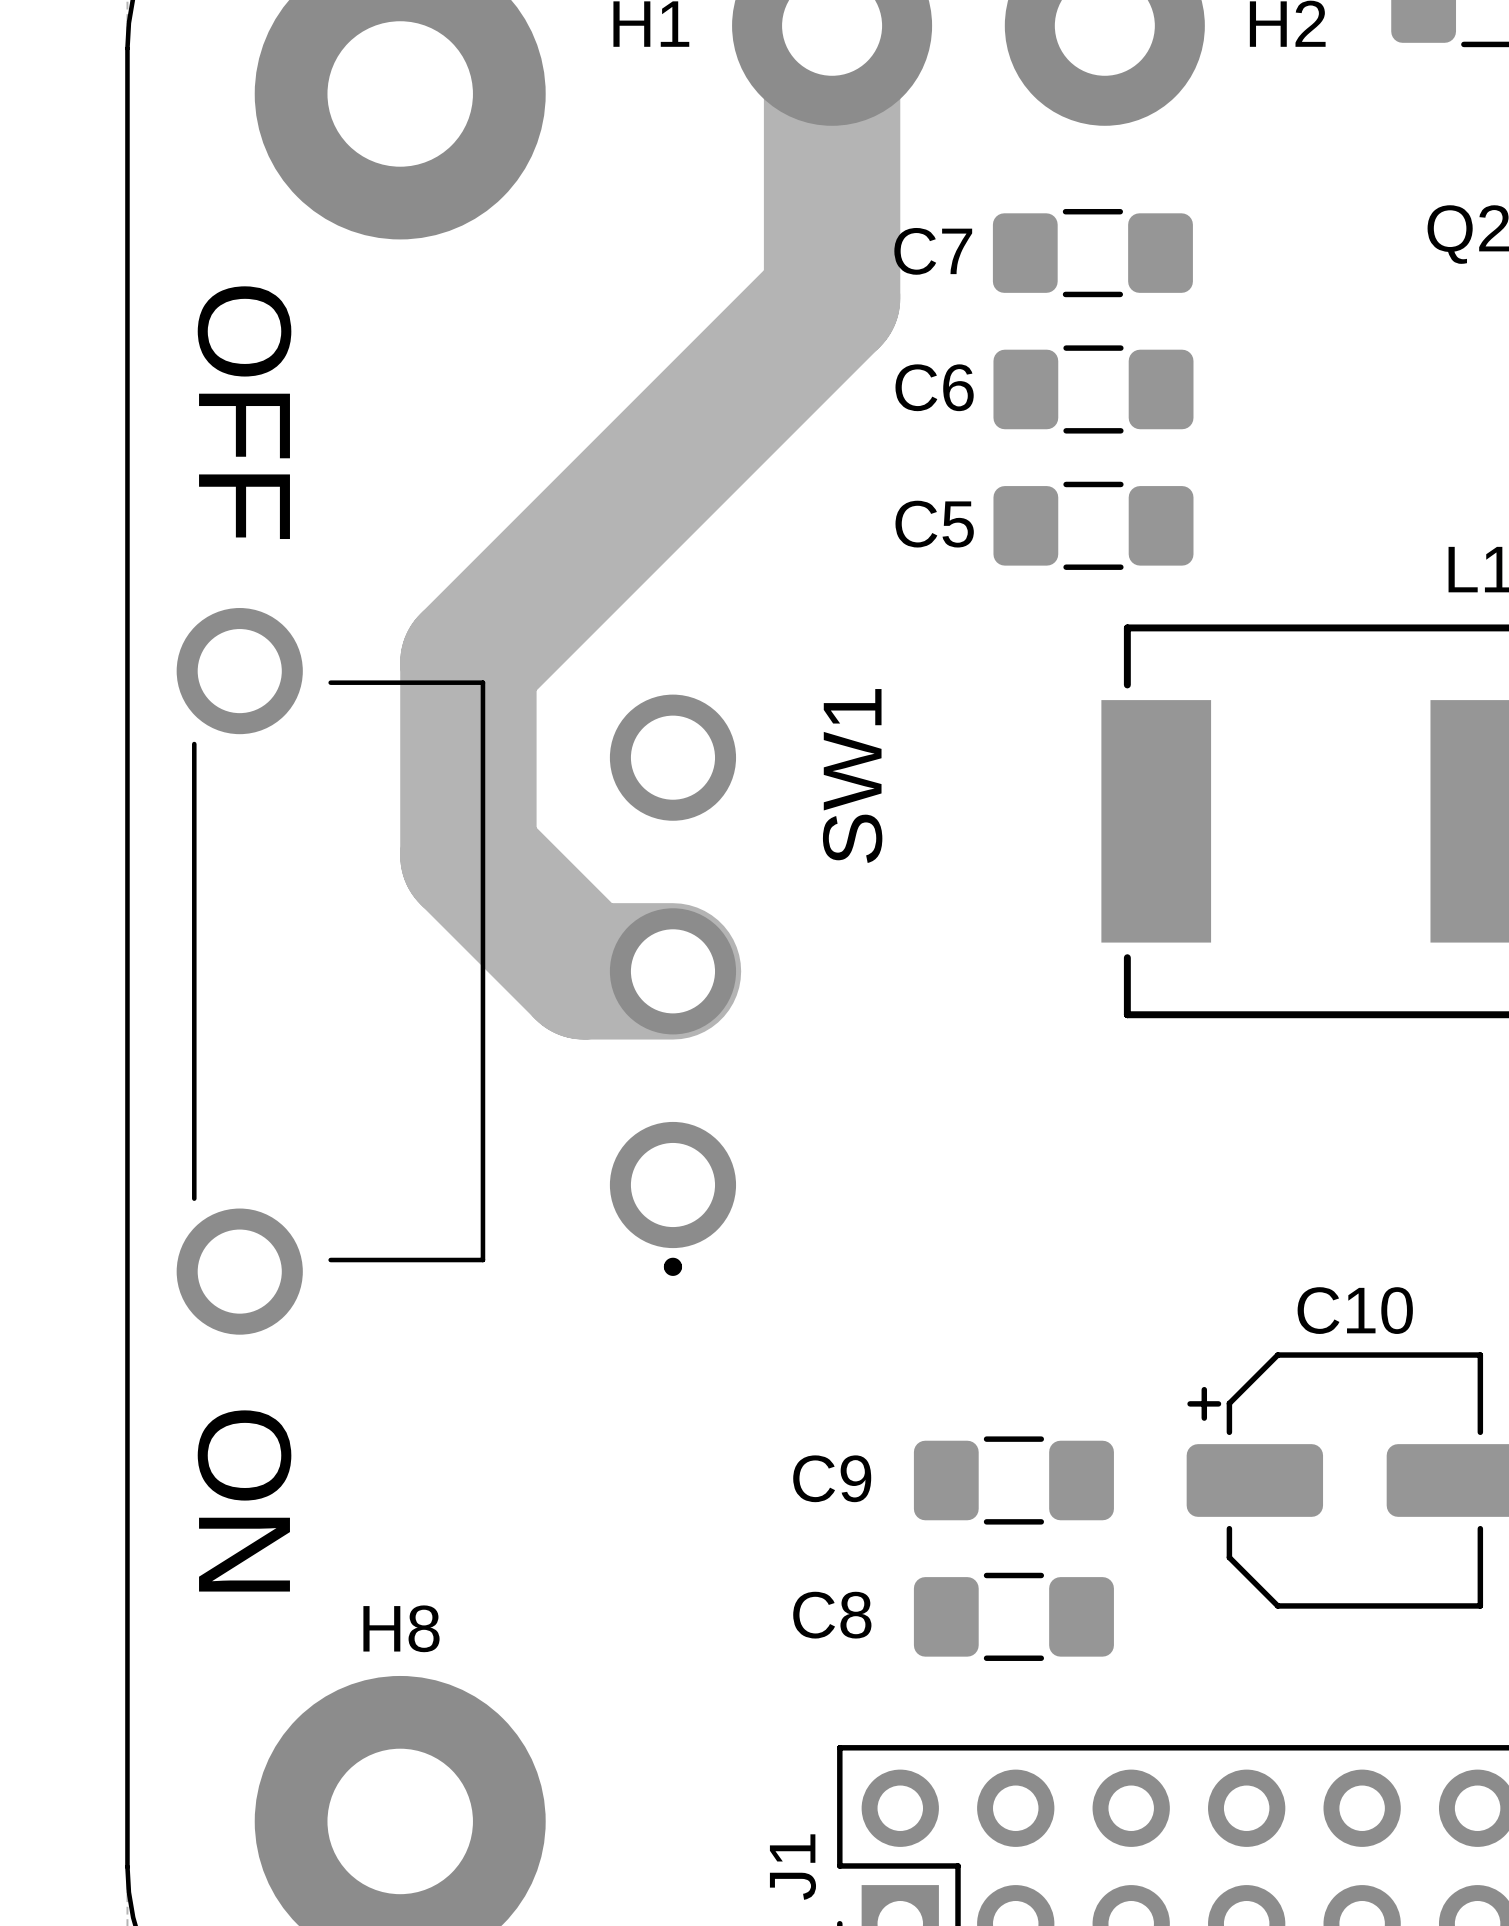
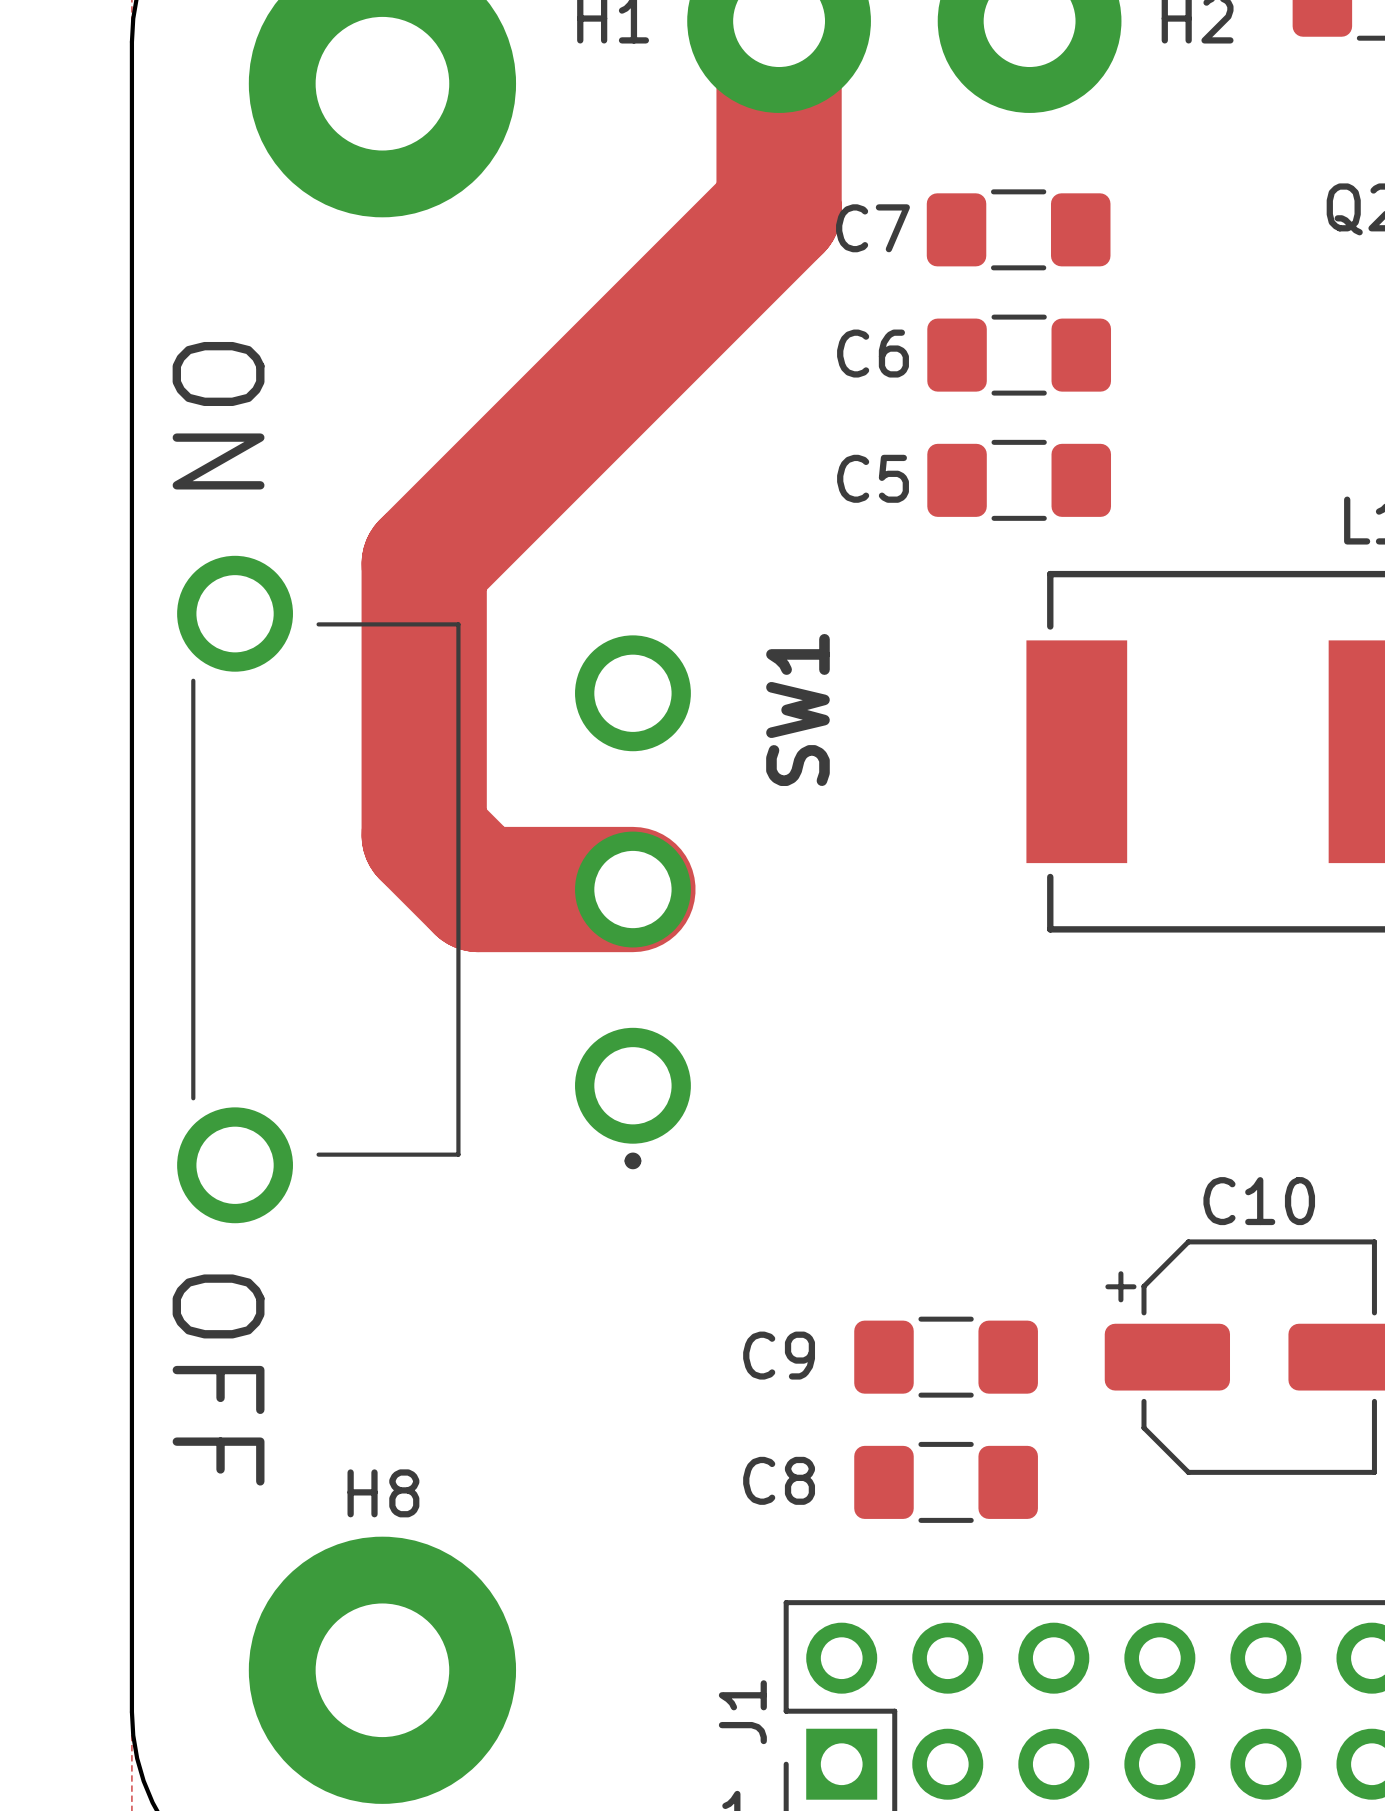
track: (832, 230) (832, 298) (468, 662) (468, 855) (583, 971) -> (779, 208) (424, 563) (424, 835) (478, 889) (551, 889)
text: OFF (244, 412) -> none
text: none -> ON (218, 415)
text: ON (244, 1500) -> OFF (218, 1380)

